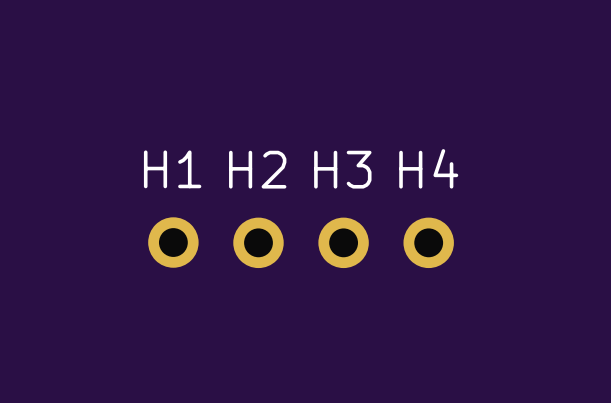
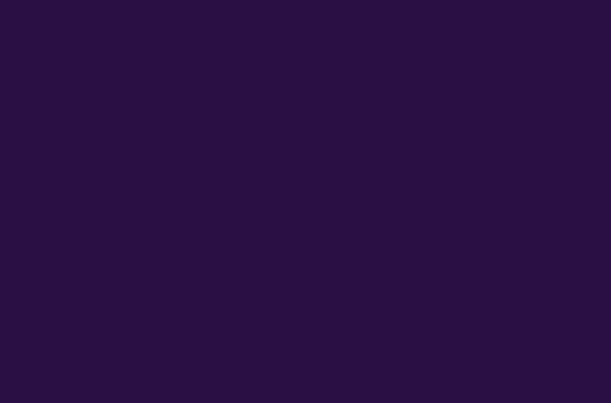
H1: (173, 242) -> none
H2: (258, 242) -> none
H3: (343, 242) -> none
H4: (428, 242) -> none

